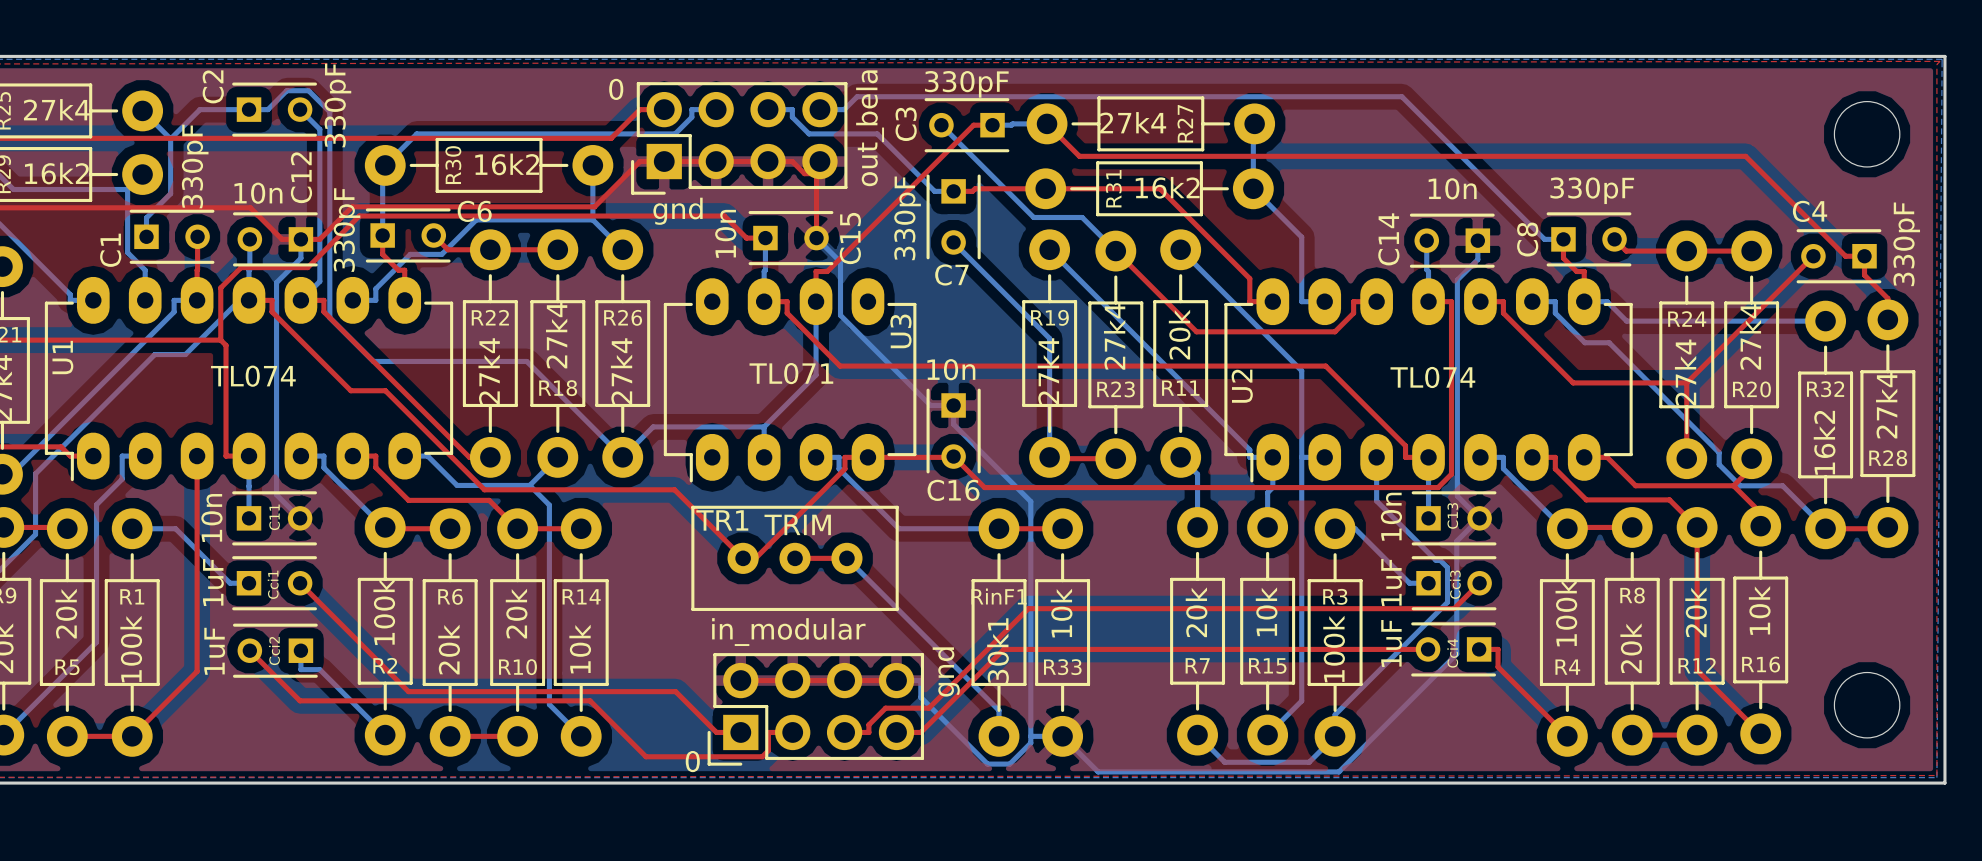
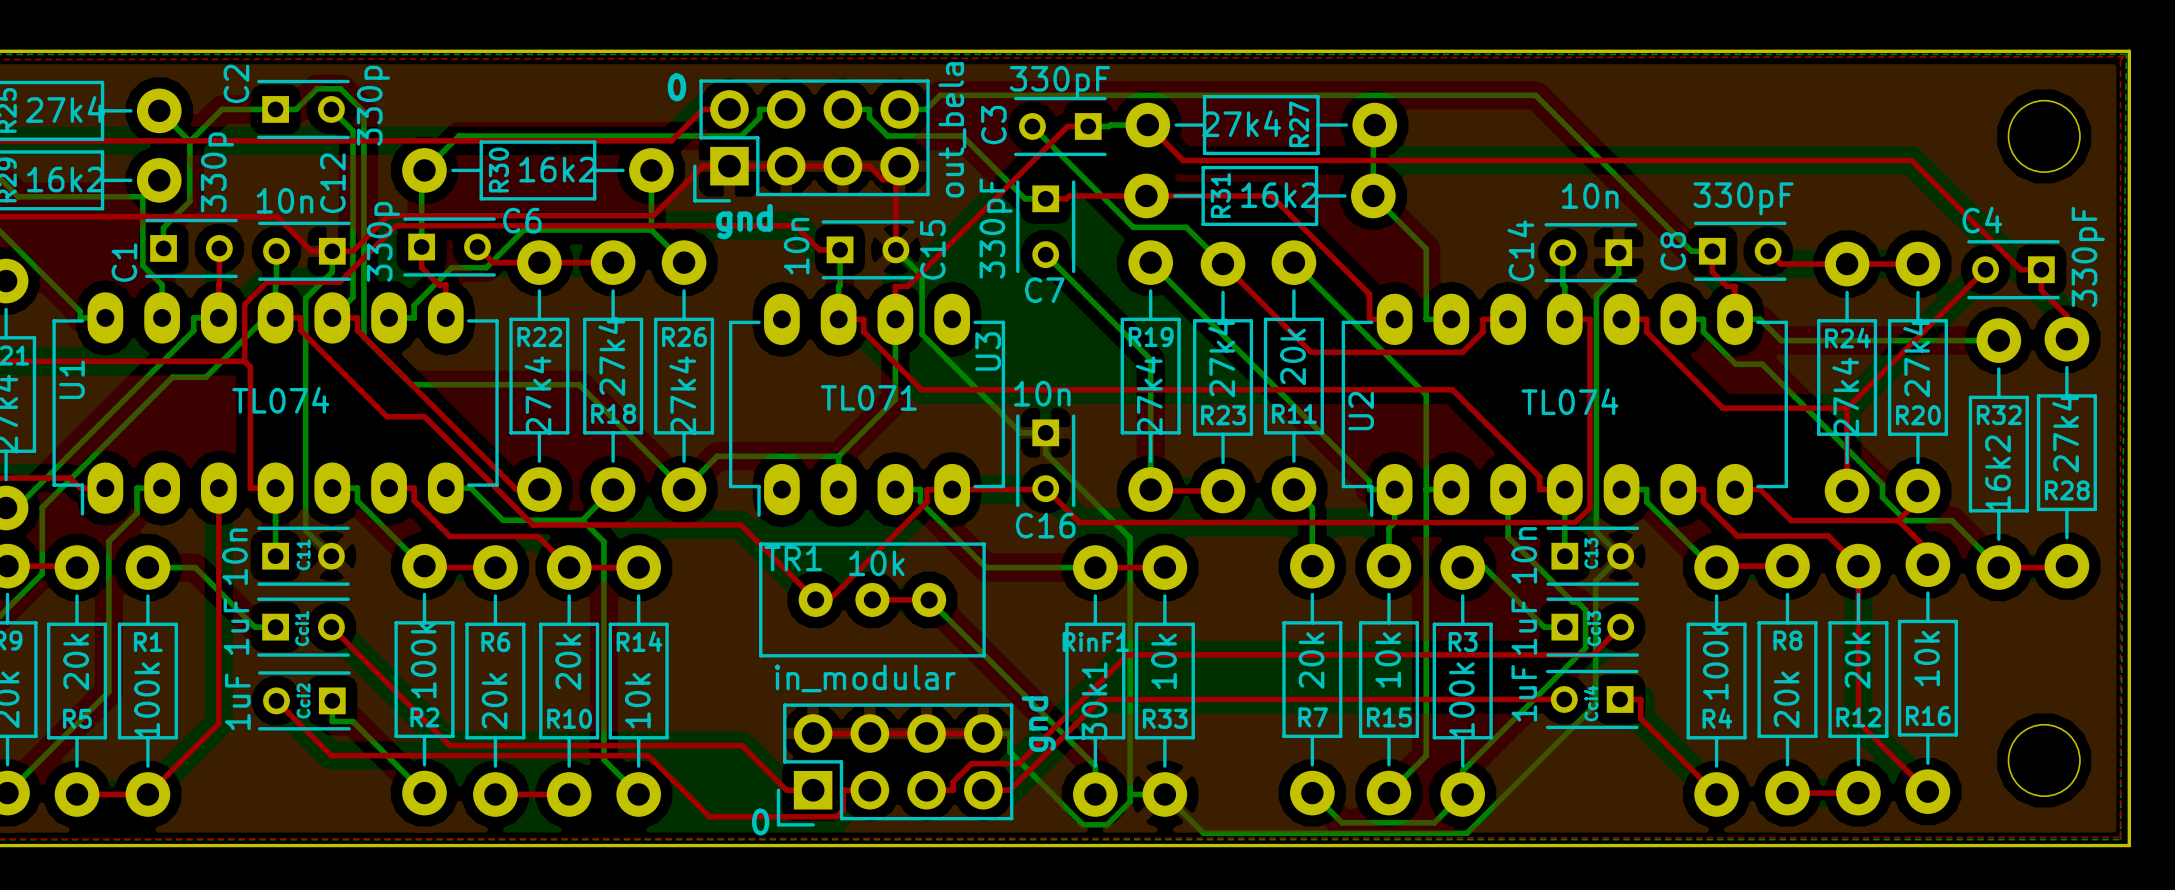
C2 value: 330pF (337, 105) -> 330p (373, 105)
C1 value: 330pF (195, 166) -> 330p (217, 172)
C6 value: 330pF (347, 230) -> 330p (383, 241)
TR1 value: TRIM (797, 524) -> 10k (876, 563)

